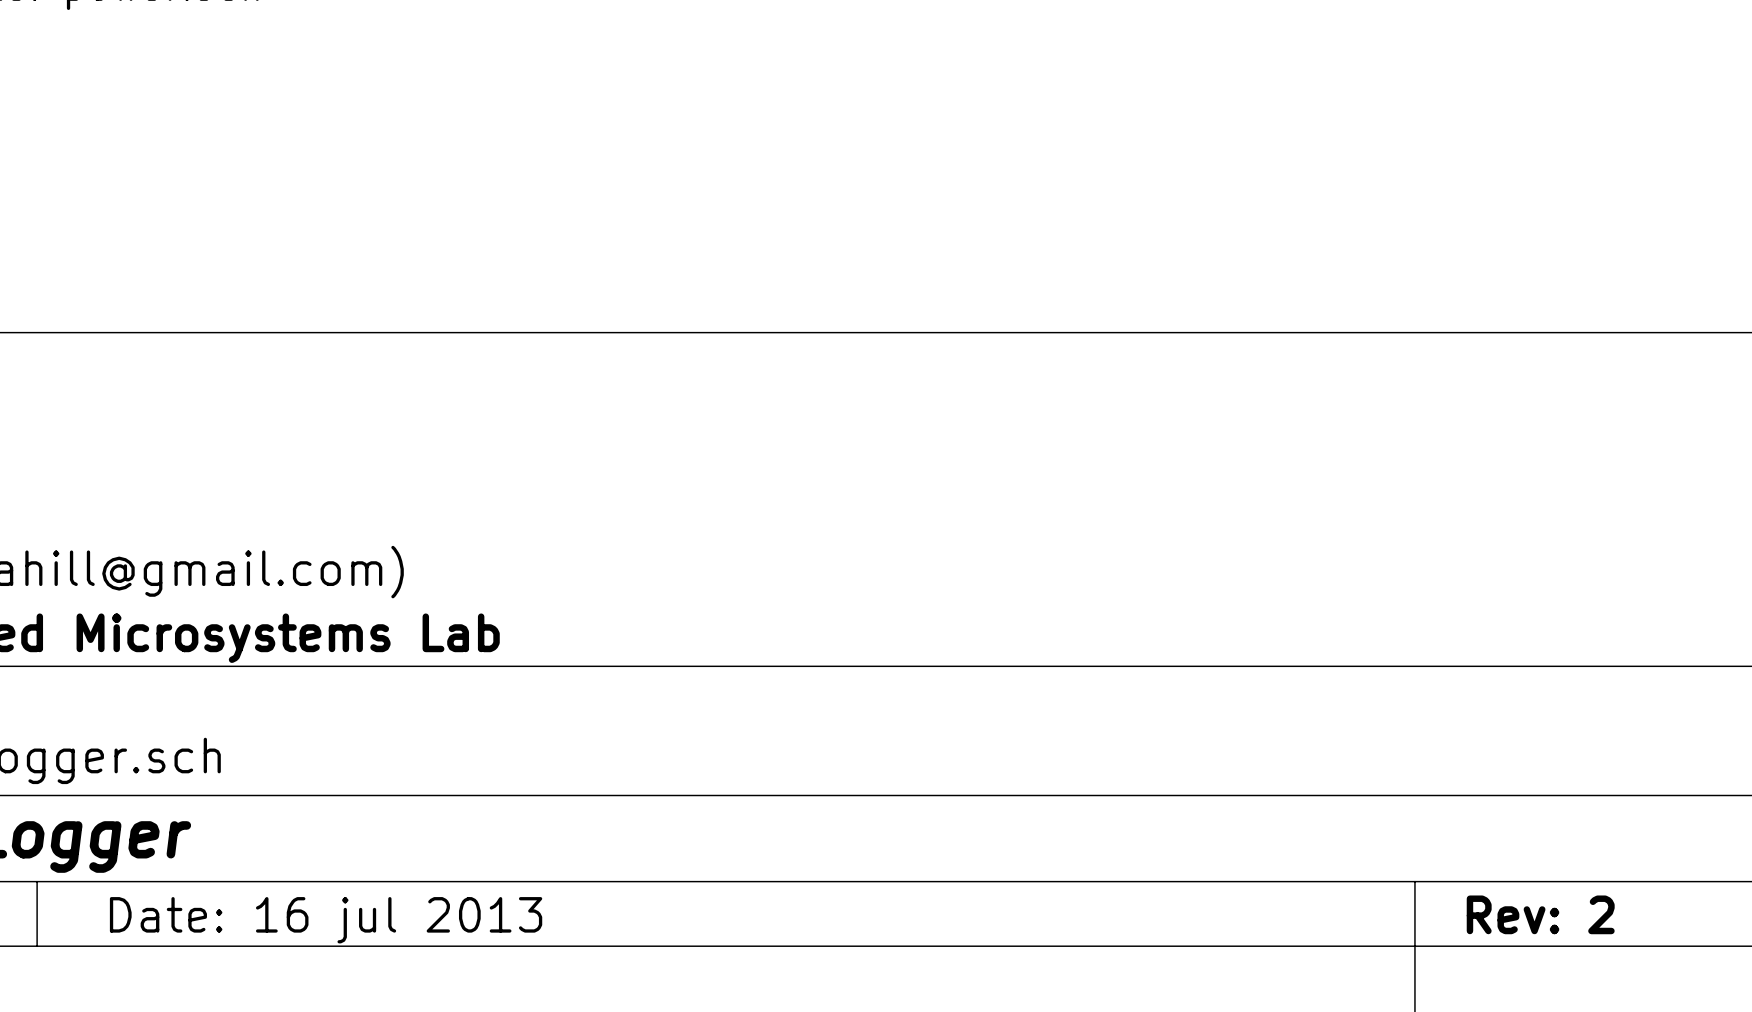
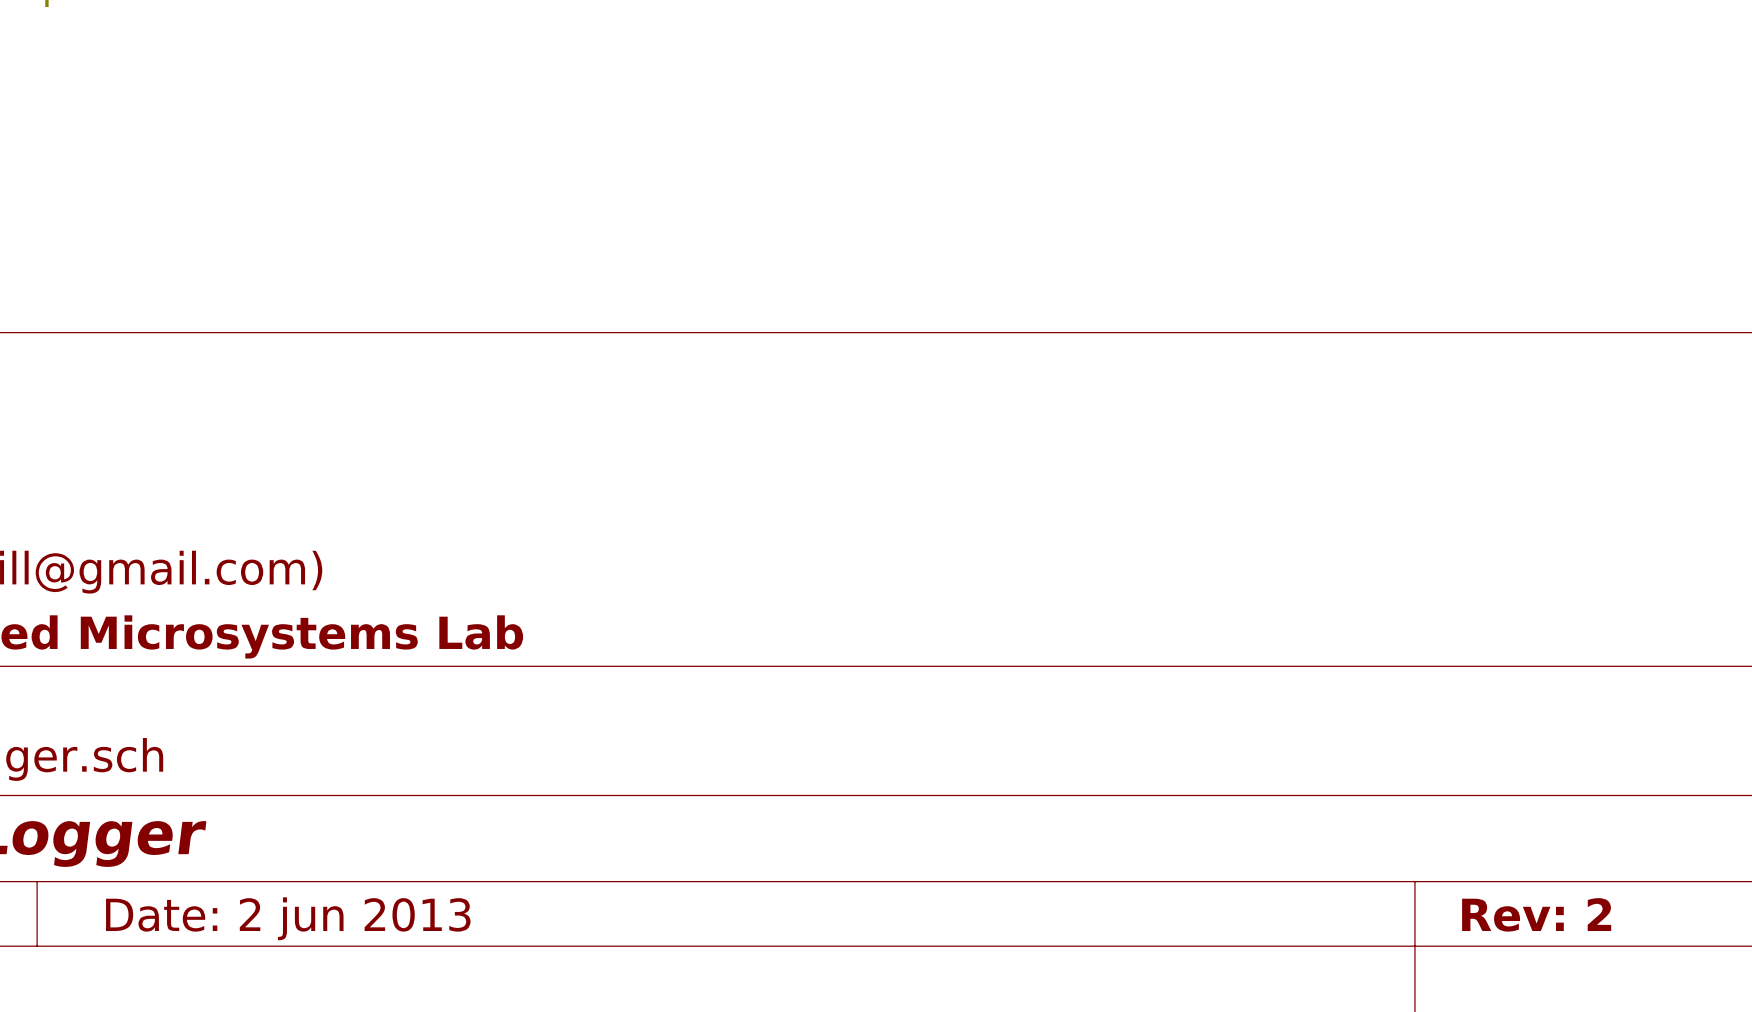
title block: Date: 16 jul 2013 (326, 920) -> Date: 2 jun 2013 (288, 918)

